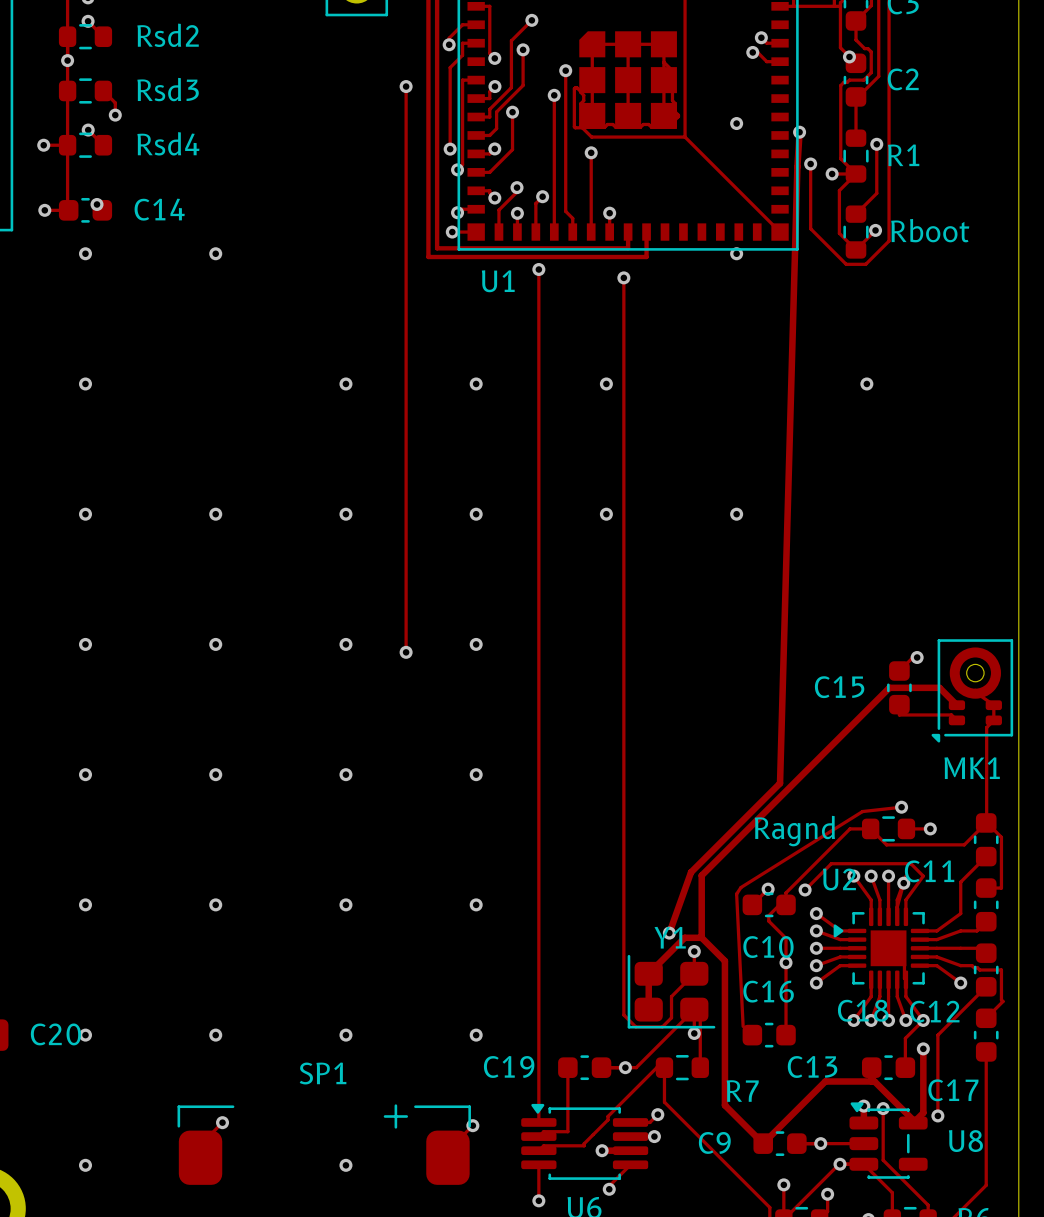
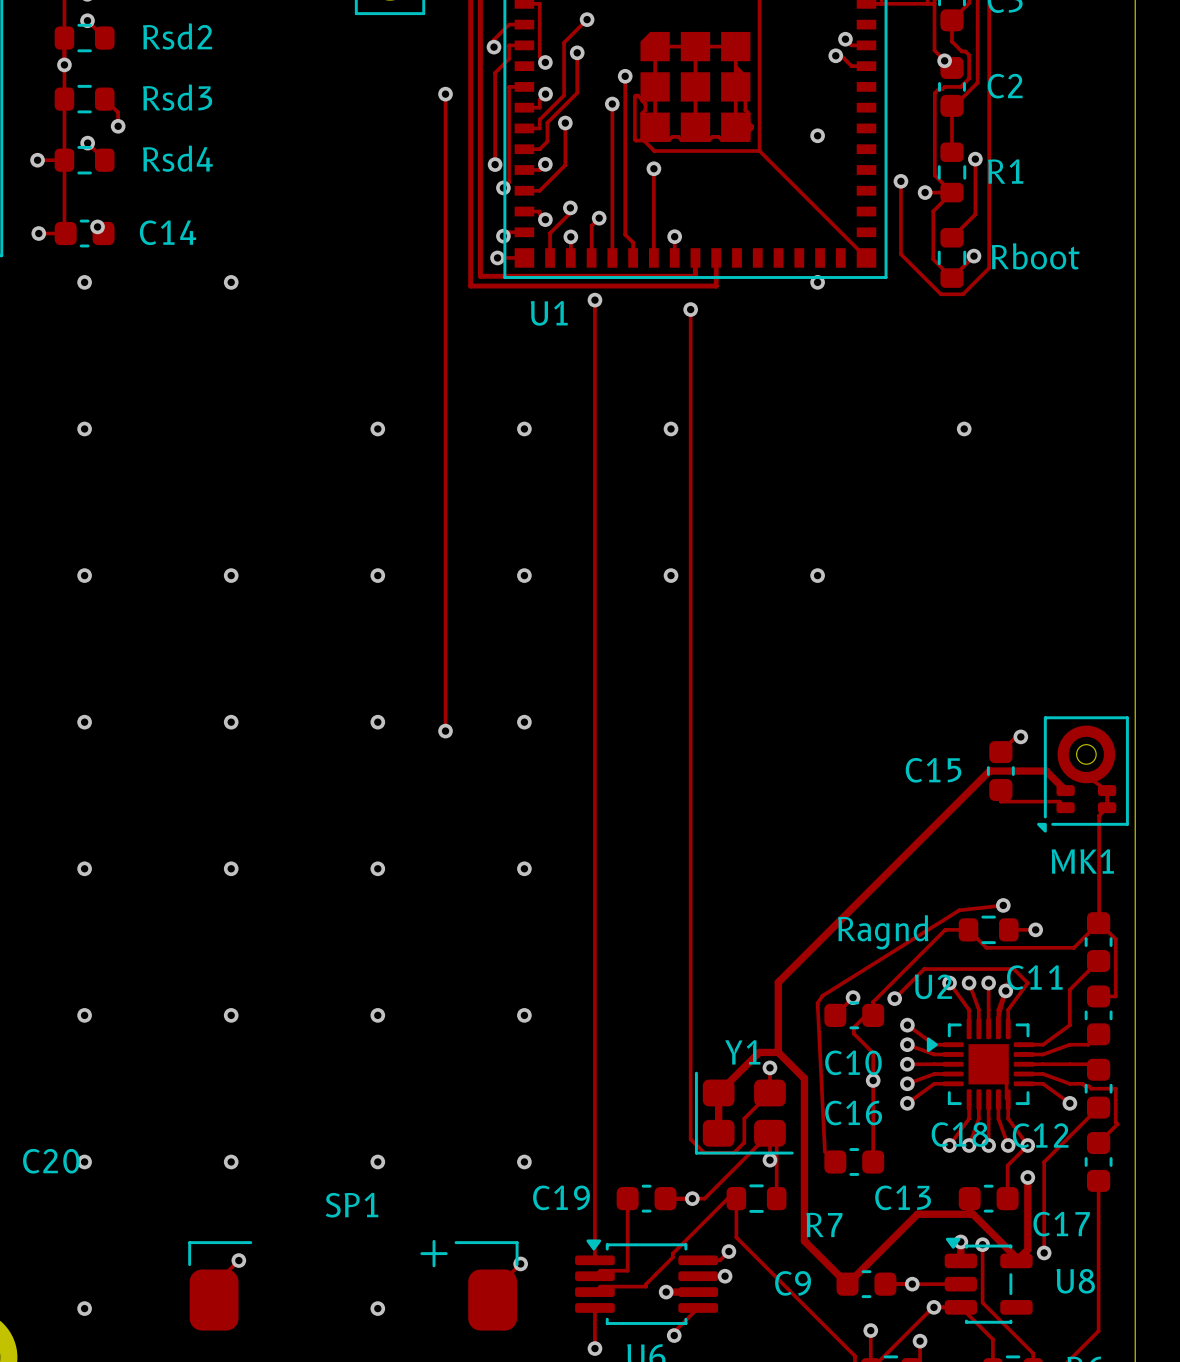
track: (799, 132) (780, 783) (691, 872) (669, 933) -> none
via: (799, 132) -> none
via: (669, 933) -> none

